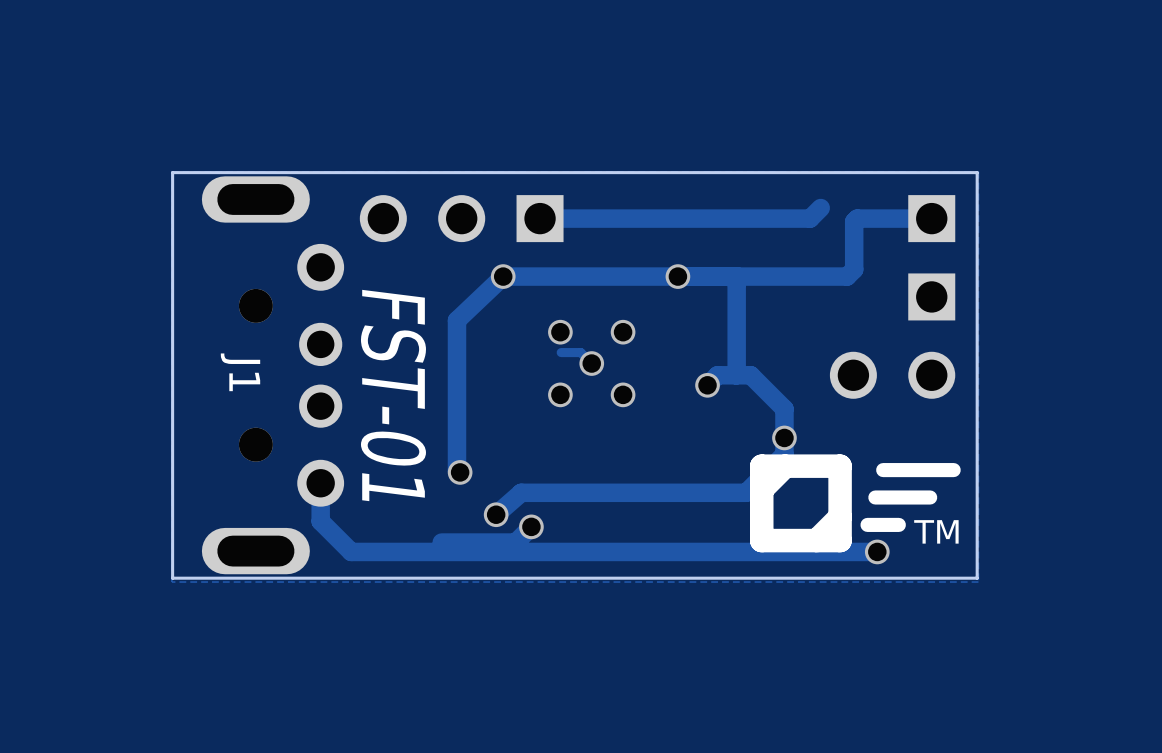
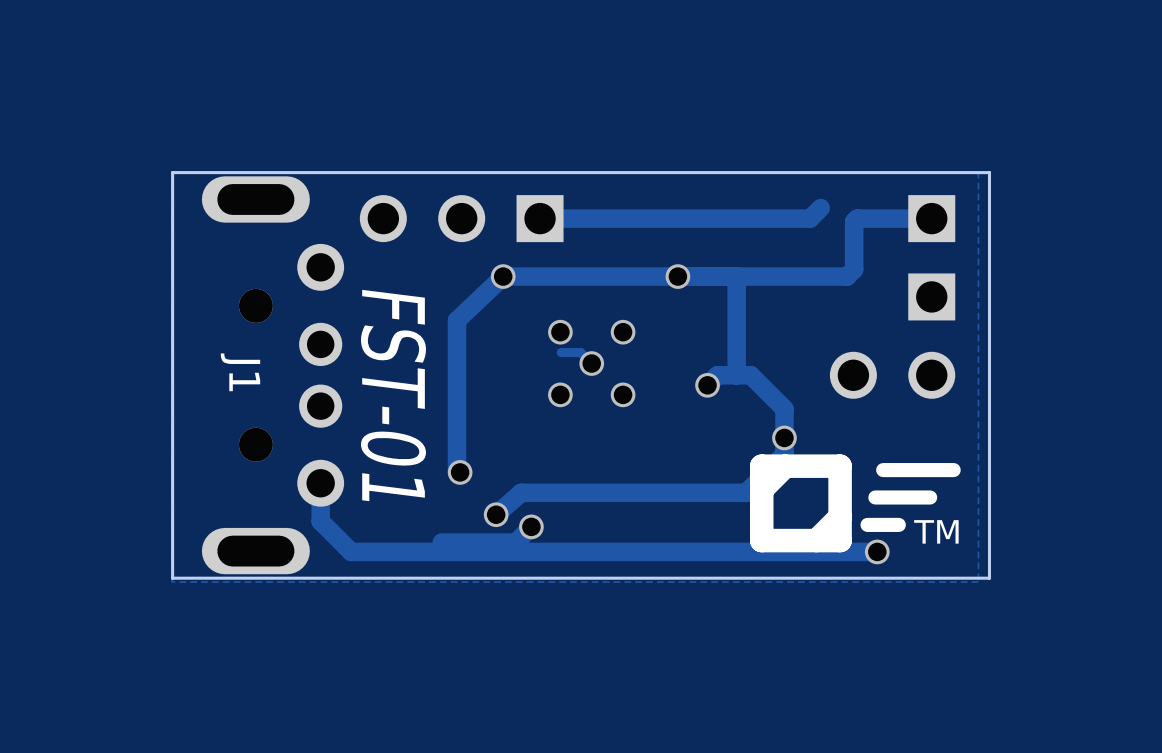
board edge: (977, 172) (977, 578) -> (977, 172) (989, 172) (989, 578) (977, 578)

